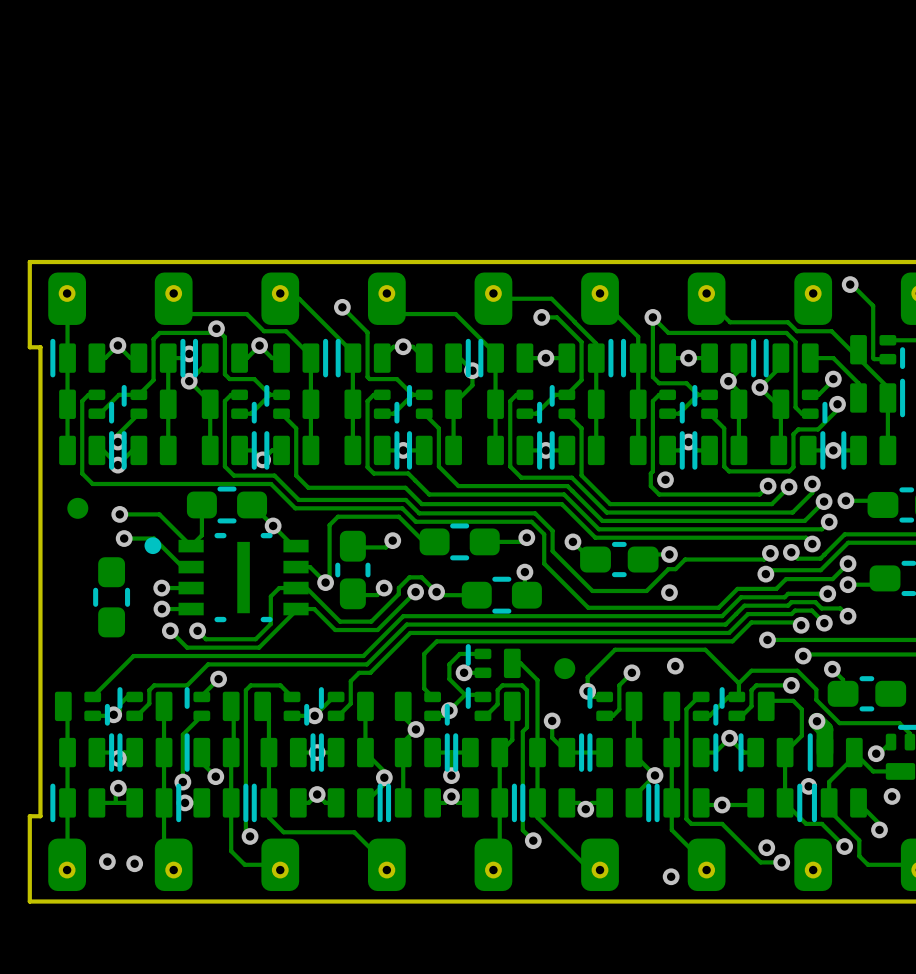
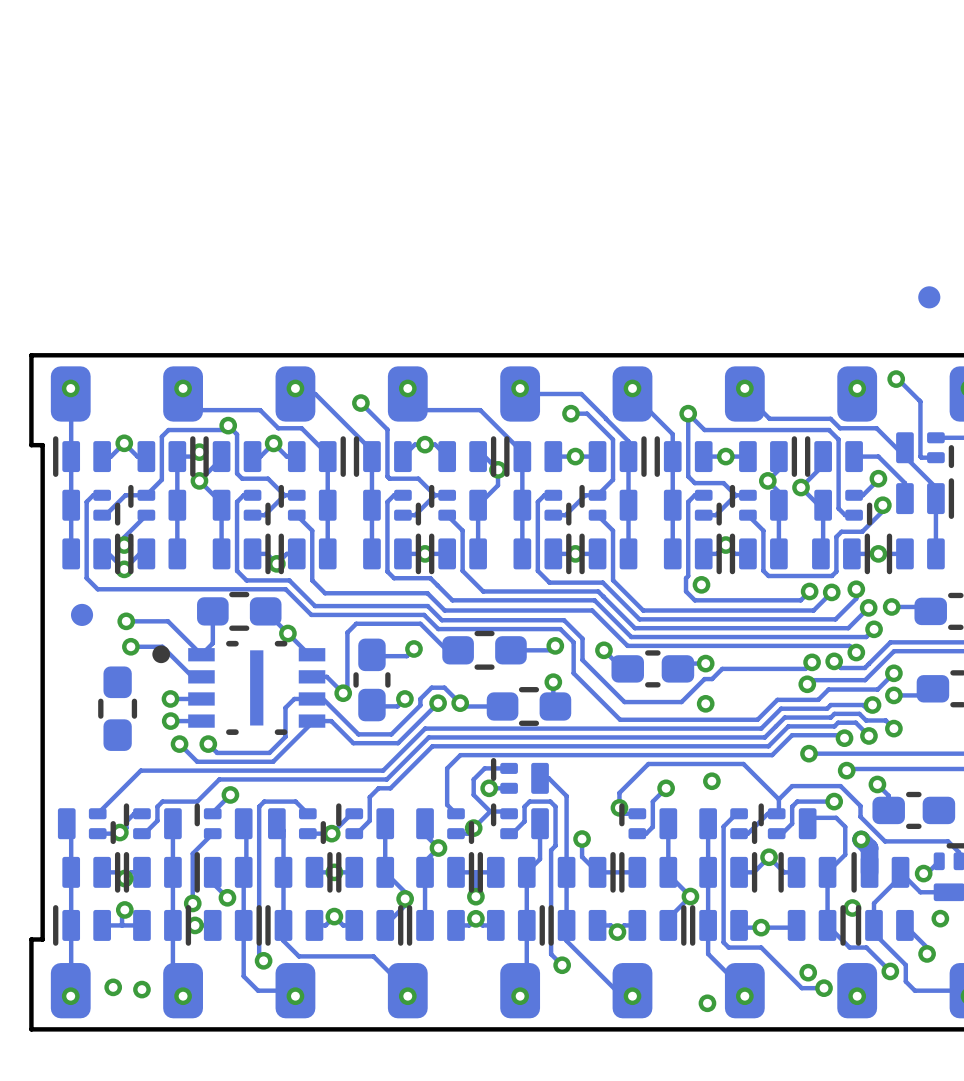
part position: (564, 668) -> (929, 297)

